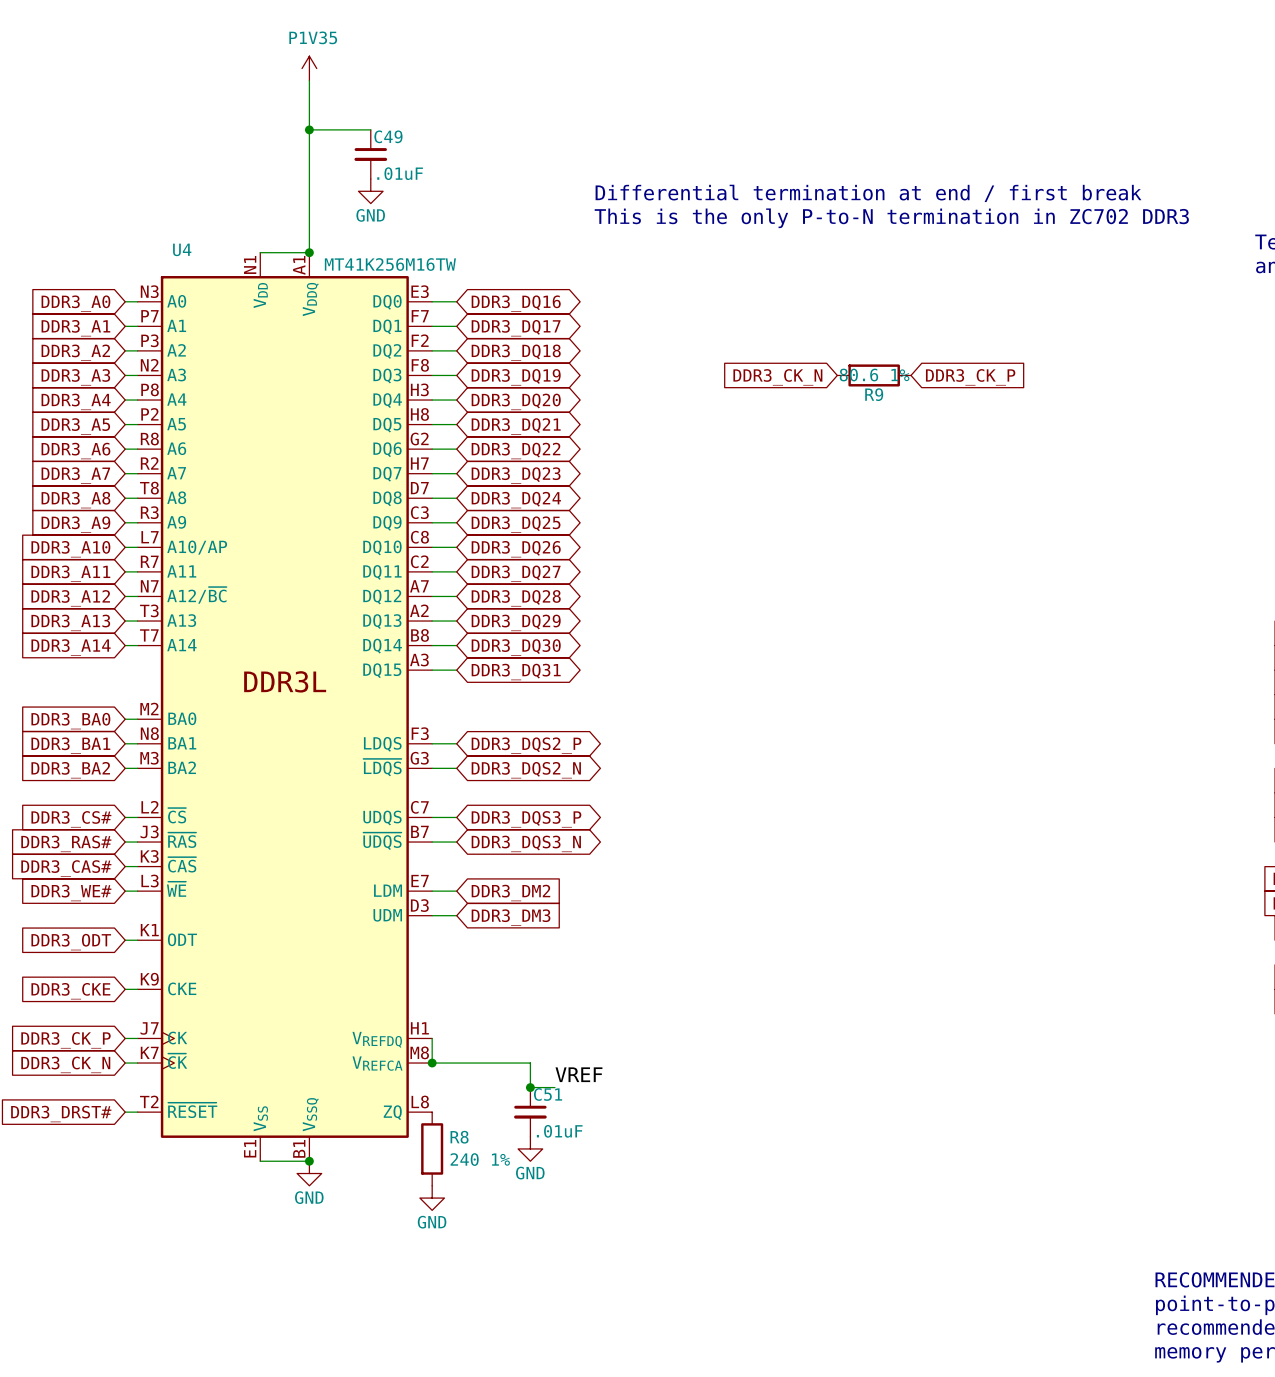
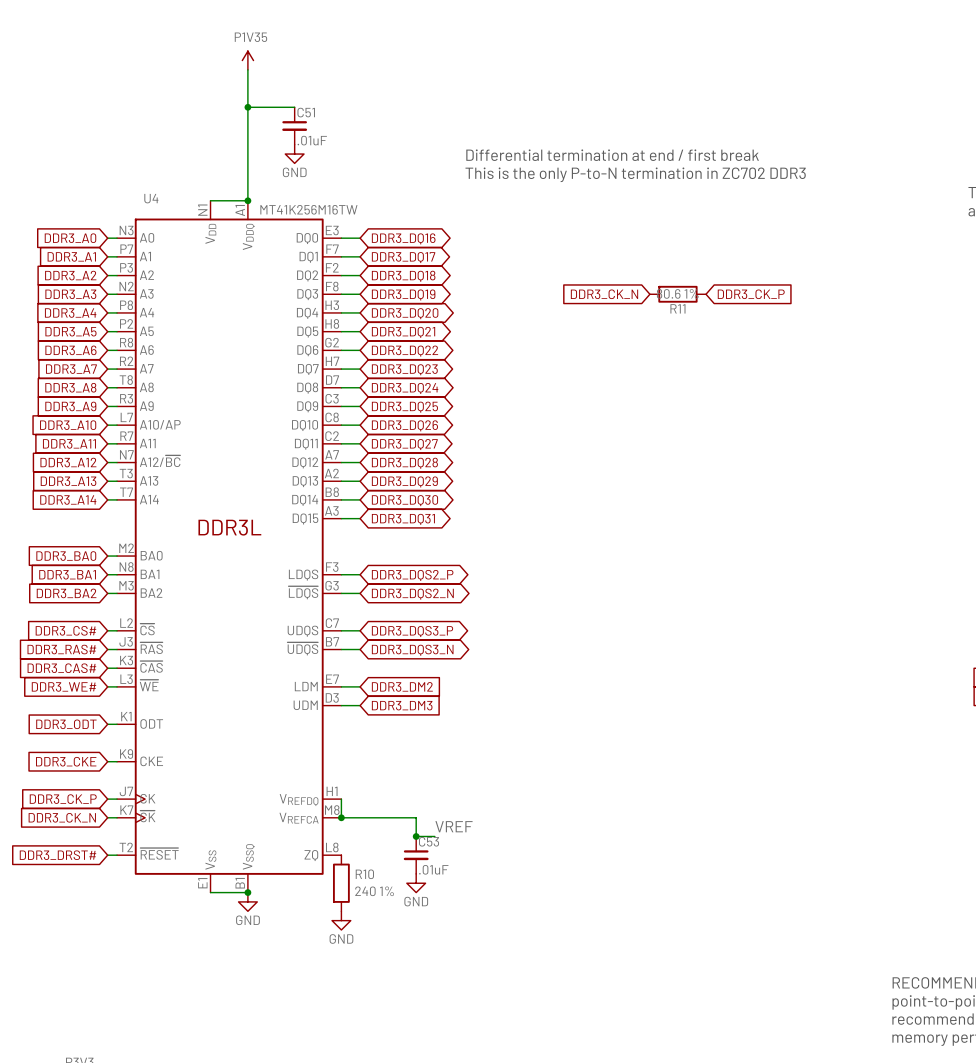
C49 name: C49 (388, 136) -> C51 (306, 112)
R9 name: R9 (874, 394) -> R11 (677, 308)
C51 name: C51 (548, 1094) -> C53 (429, 841)
R8 name: R8 (459, 1137) -> R10 (364, 874)

